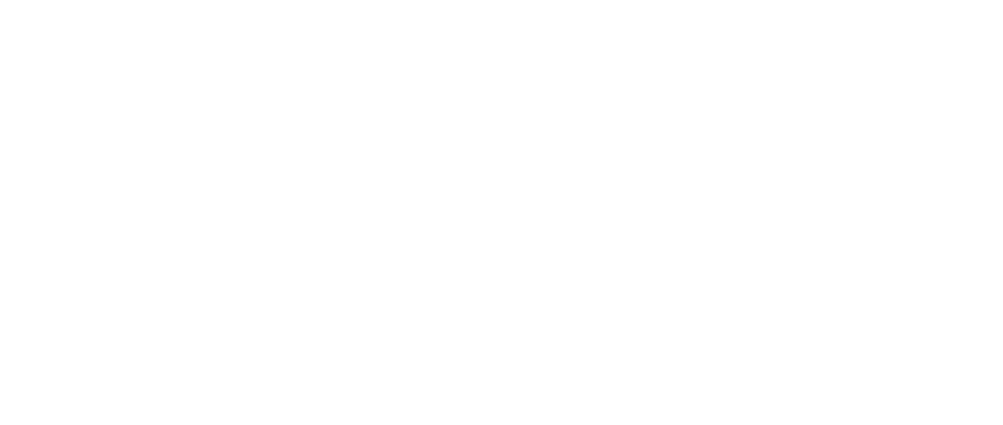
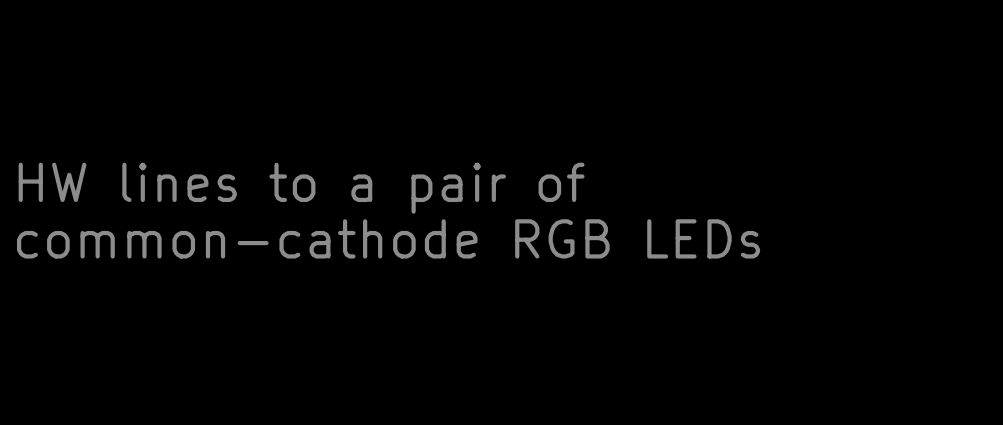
text: none -> HW lines to a pair of (301, 188)
text: none -> common-cathode RGB LEDs (388, 238)

